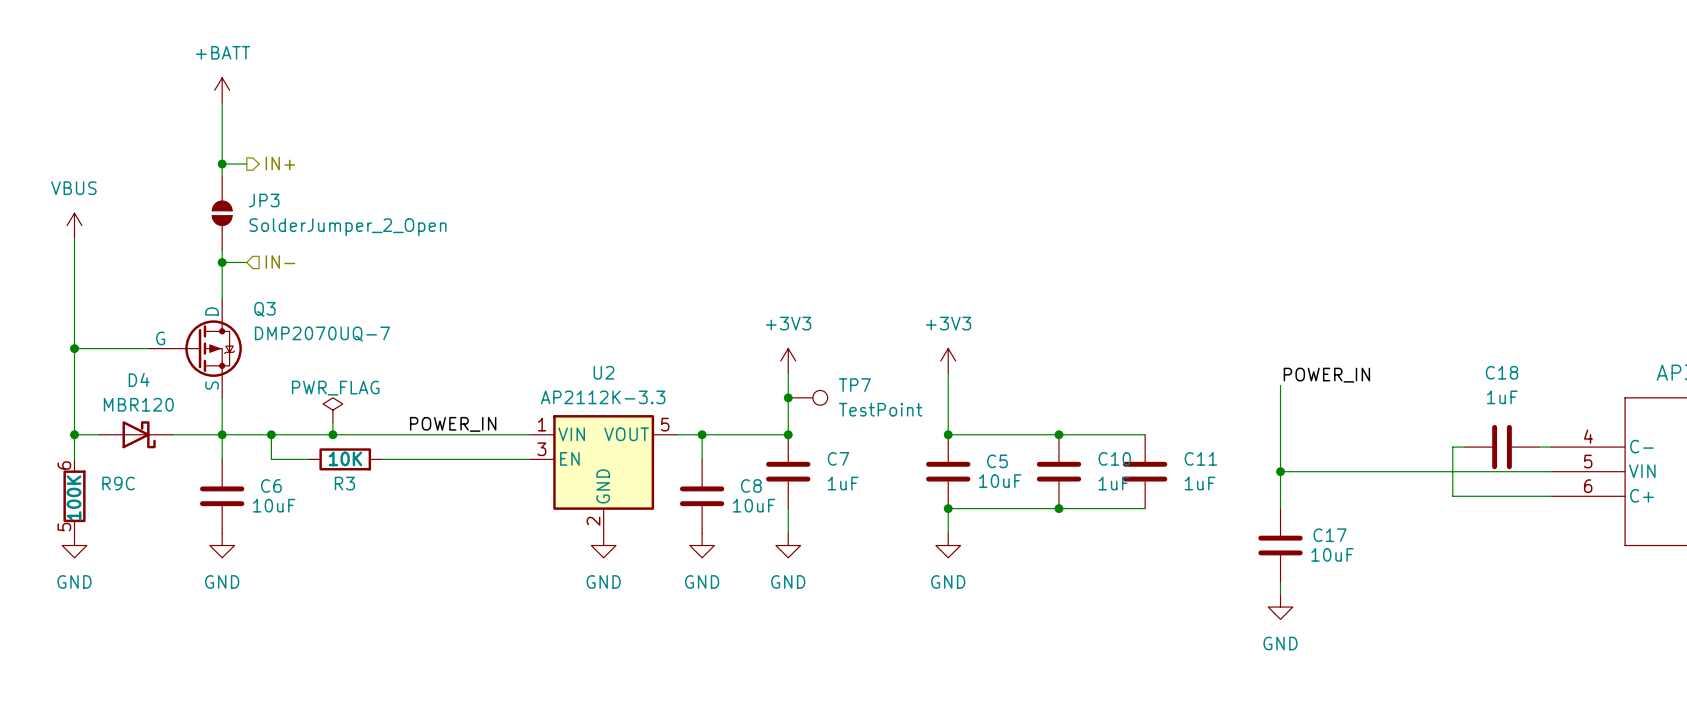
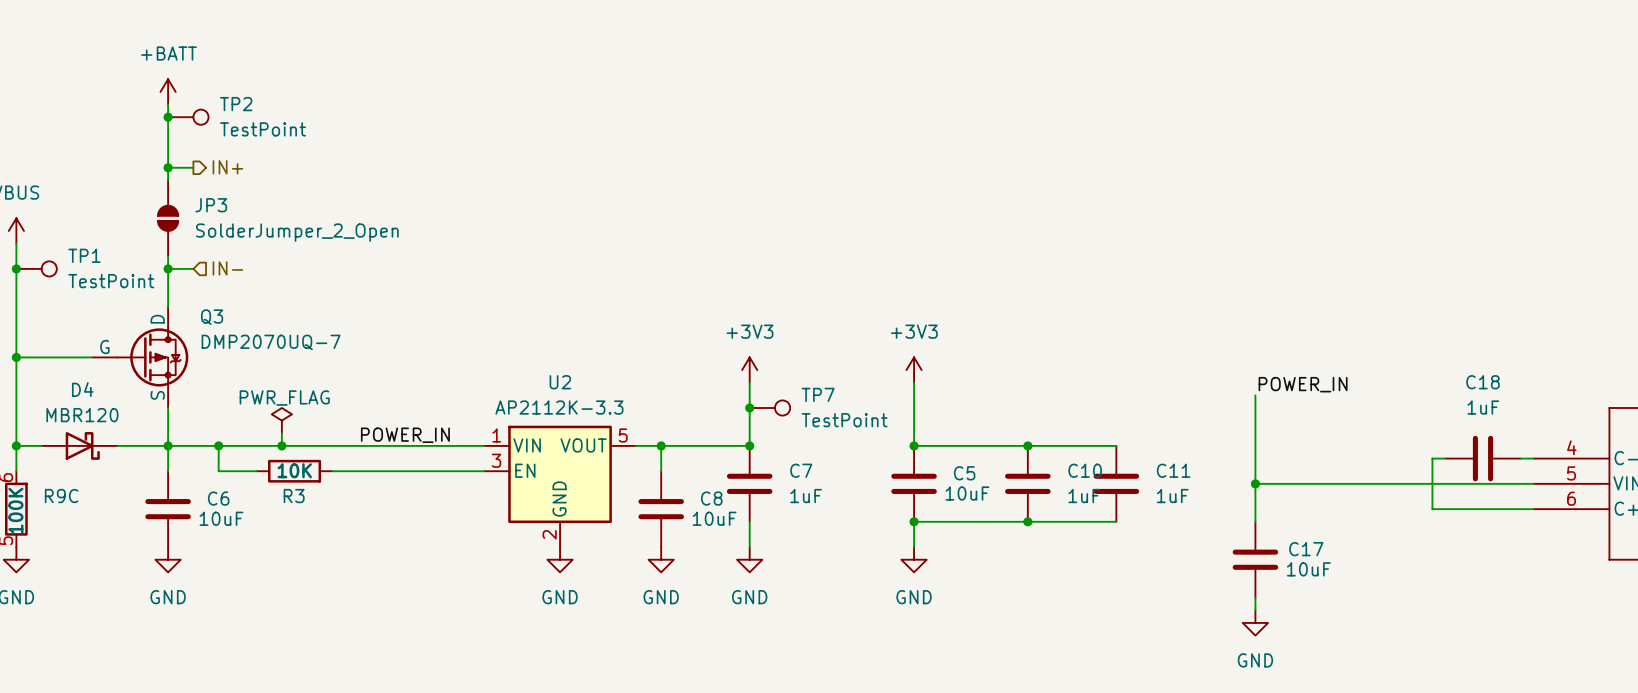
junction: none -> (168, 117)
TP2: none -> TestPoint (188, 117)
junction: none -> (16, 268)
TP1: none -> TestPoint (36, 268)

